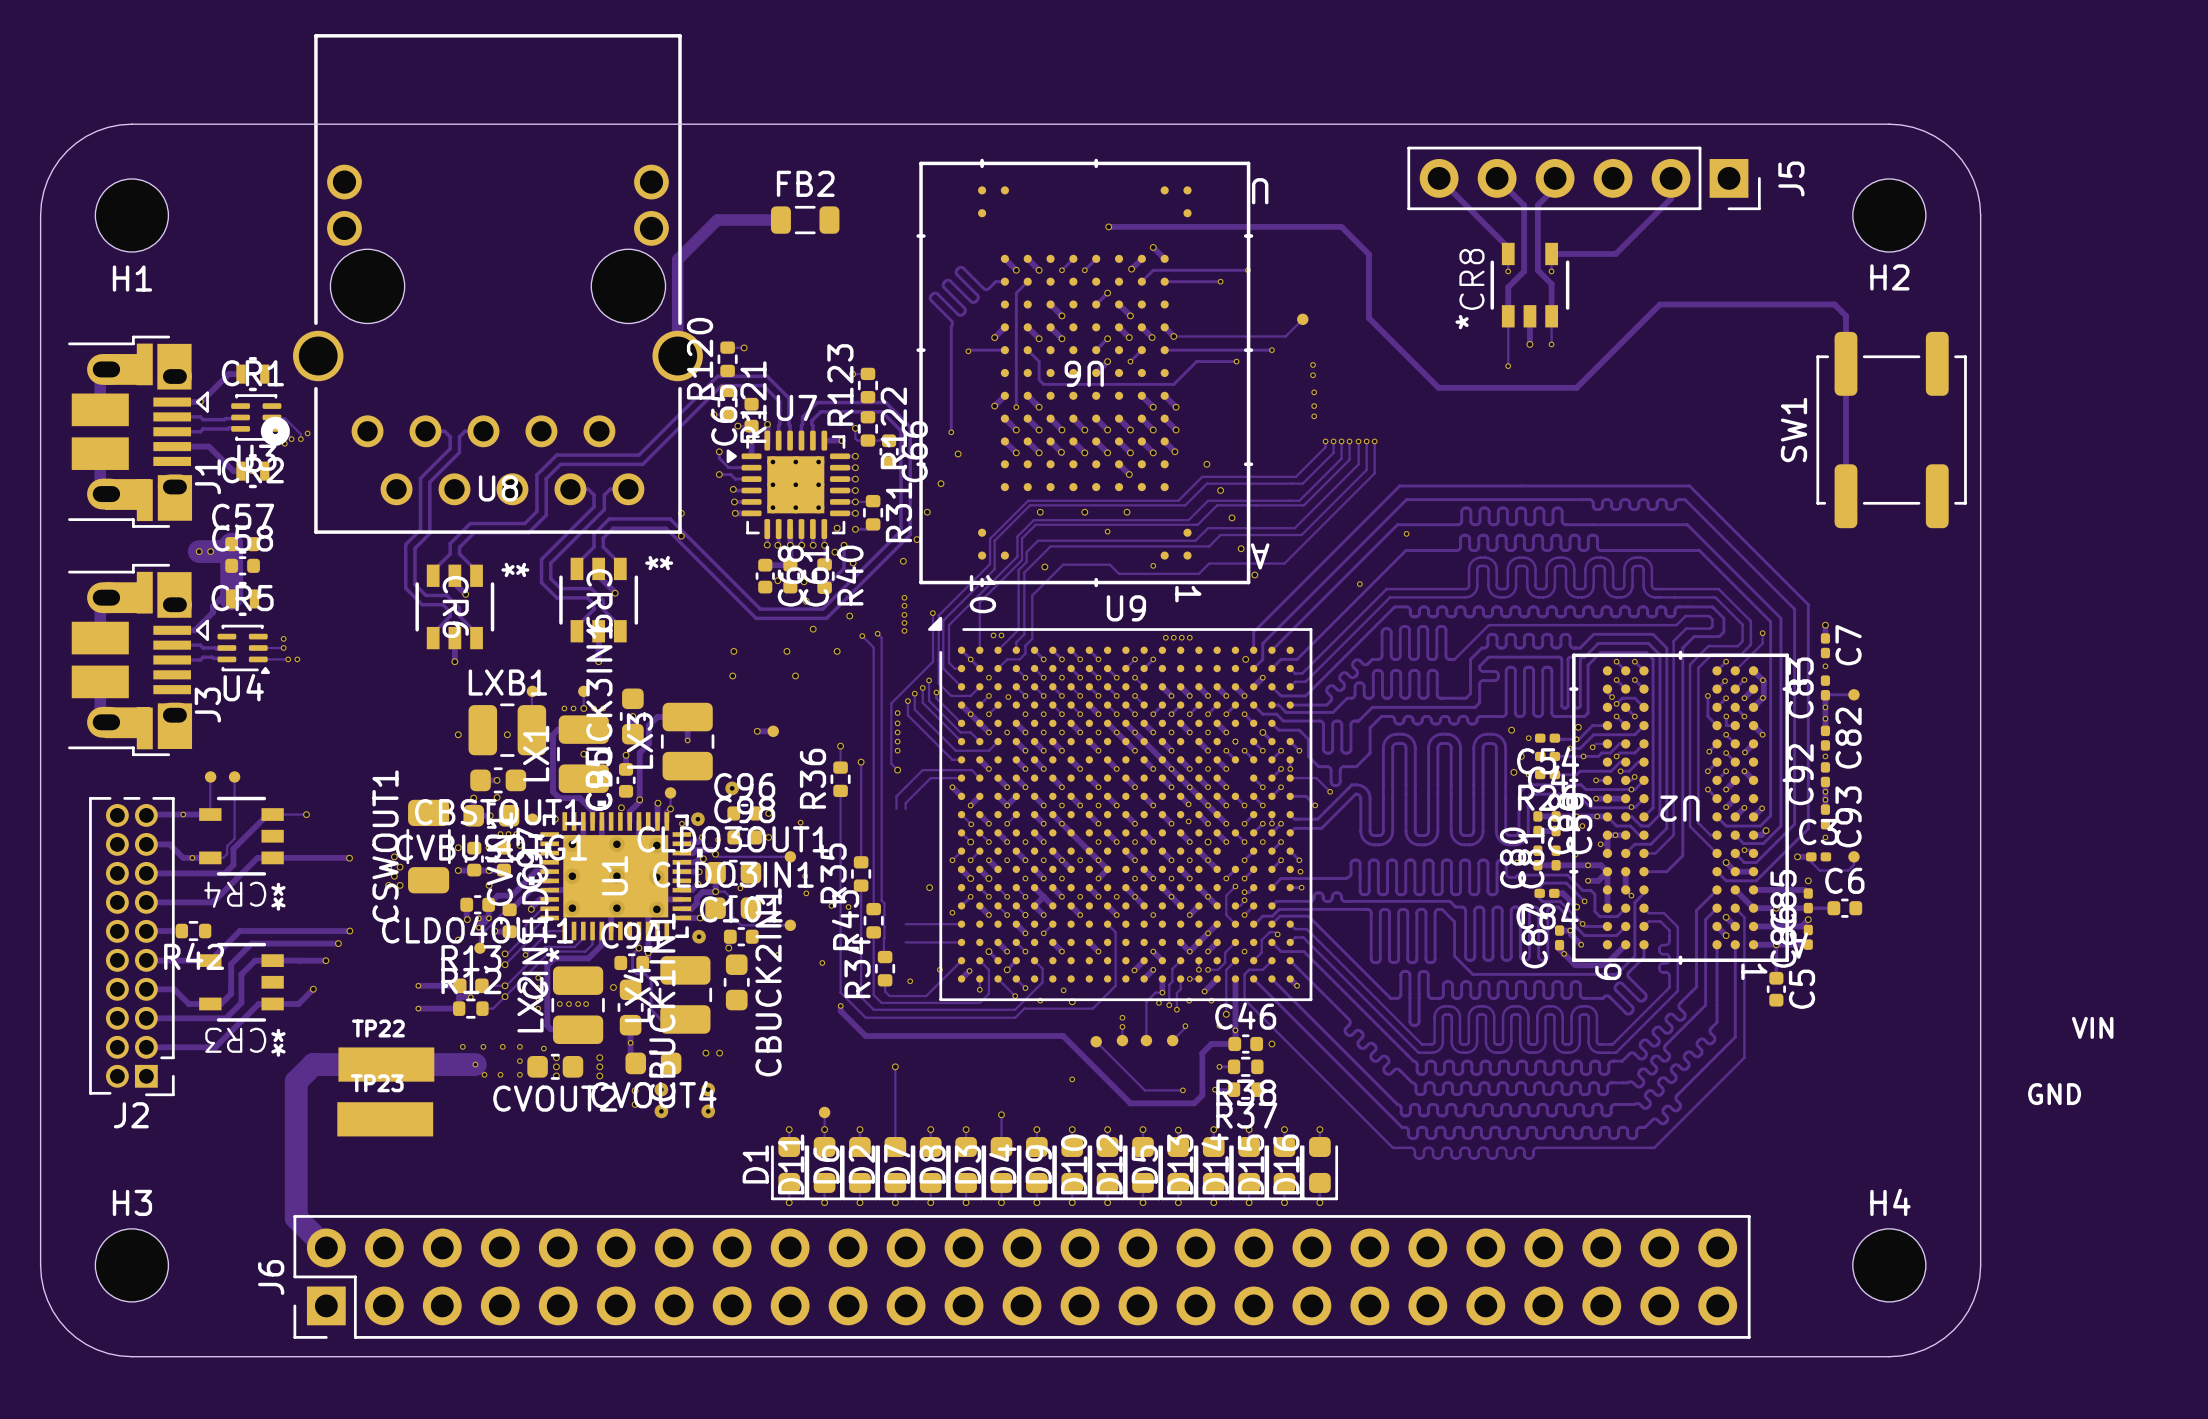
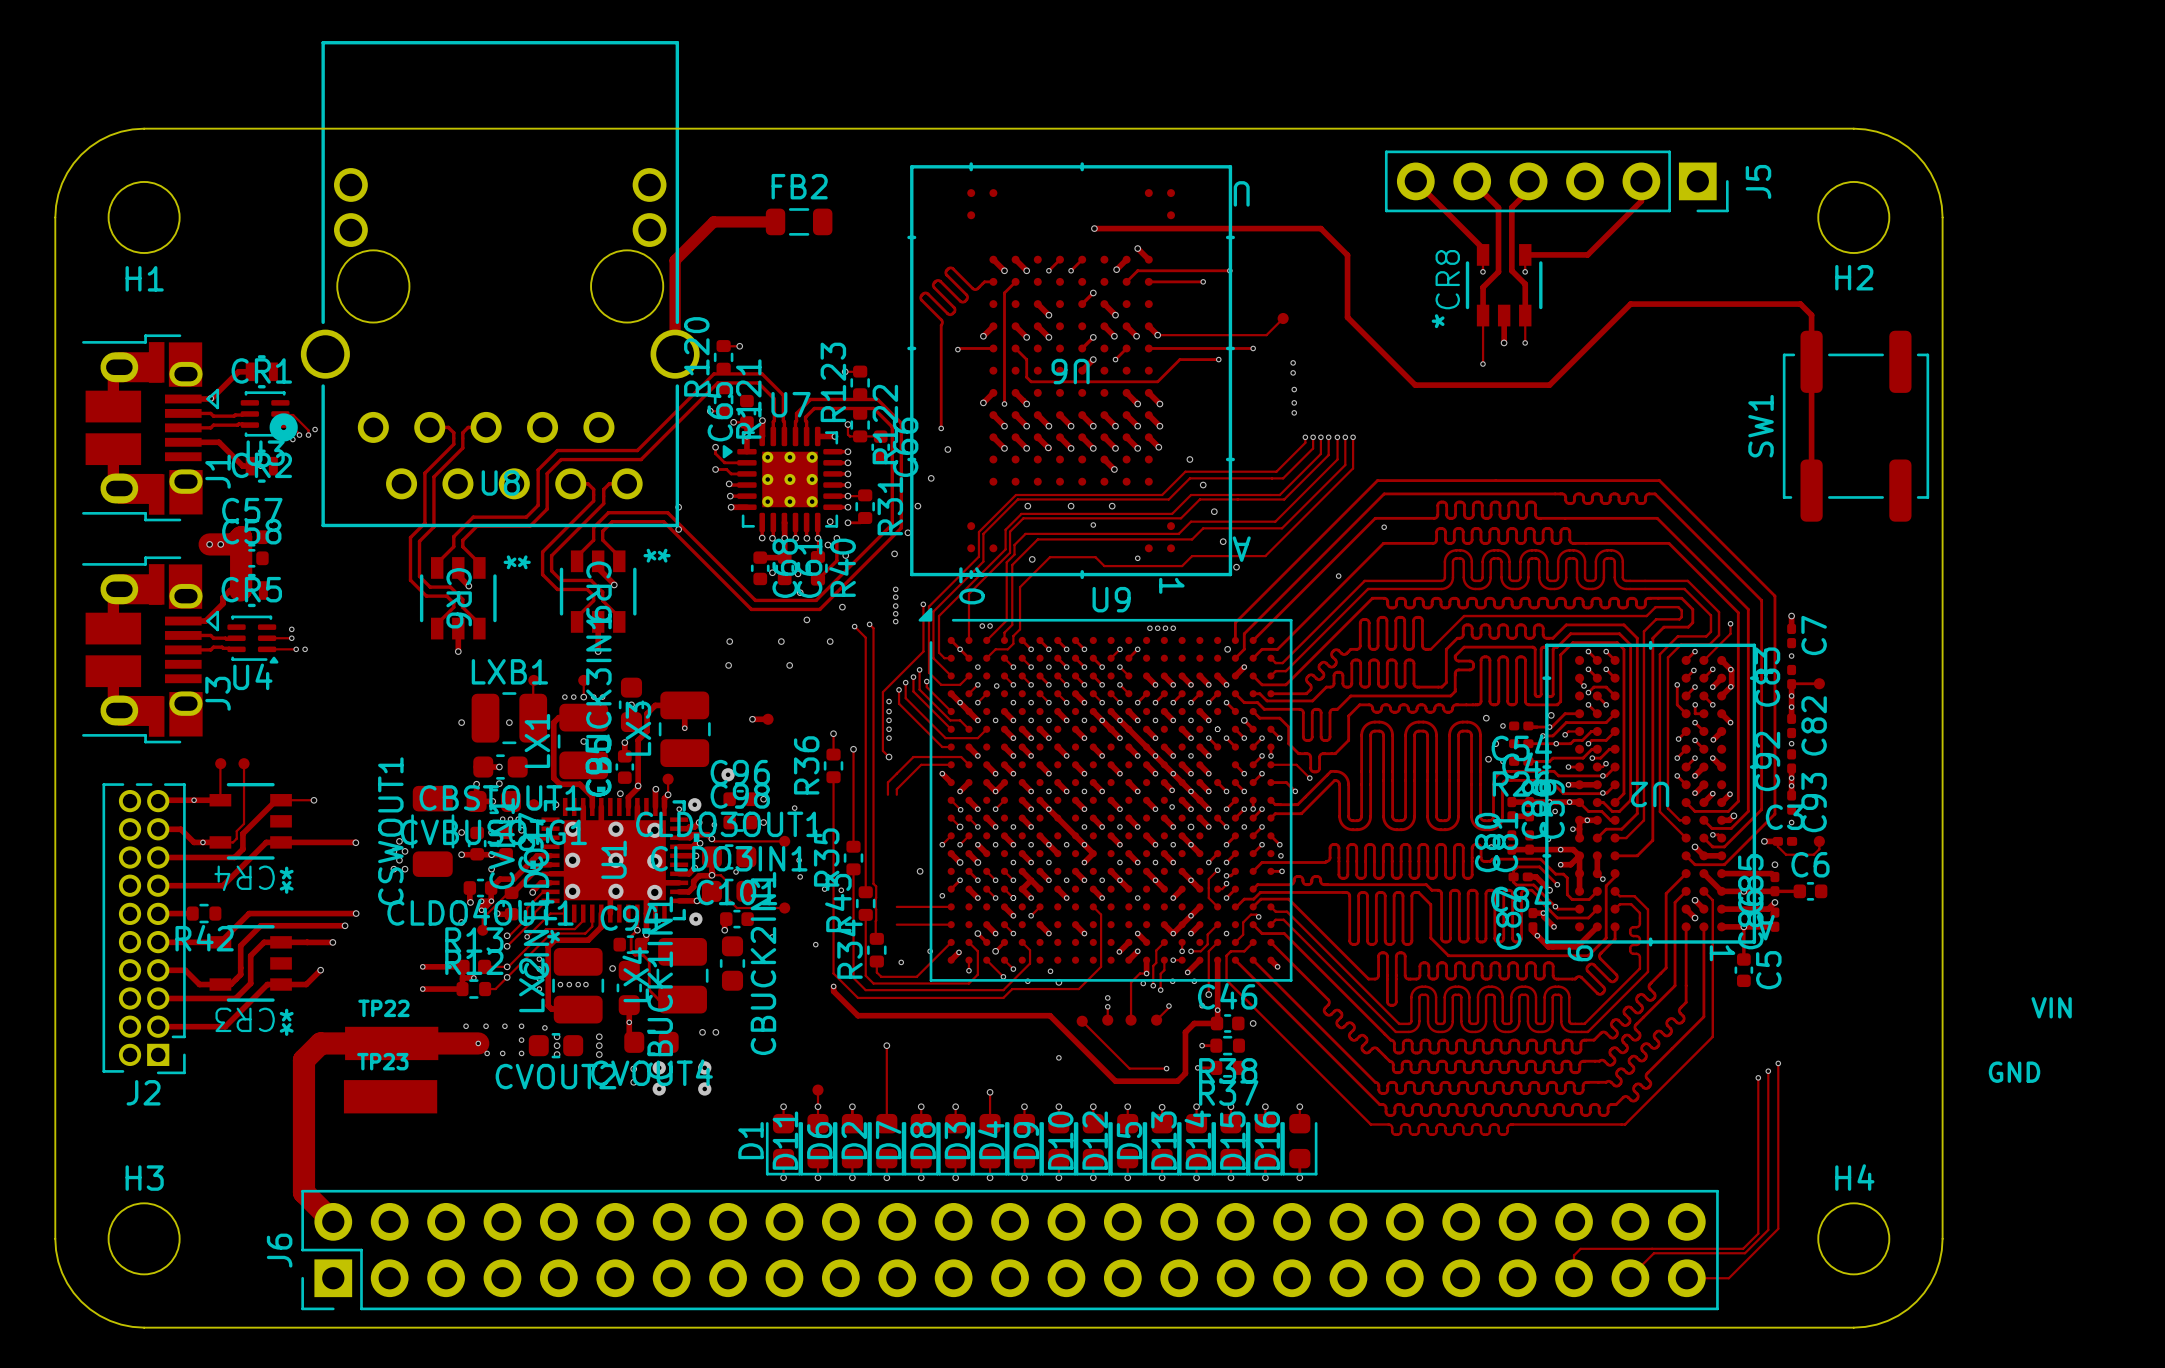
track: none -> (1778, 1063) (1778, 1228) (1728, 1278) (1686, 1278)
via: none -> (1778, 1063)
track: none -> (1768, 1071) (1768, 1229) (1744, 1253) (1653, 1253) (1630, 1278)
via: none -> (1768, 1071)
track: none -> (1758, 1077) (1758, 1233) (1743, 1248) (1580, 1248) (1574, 1255) (1574, 1278)
via: none -> (1758, 1077)

